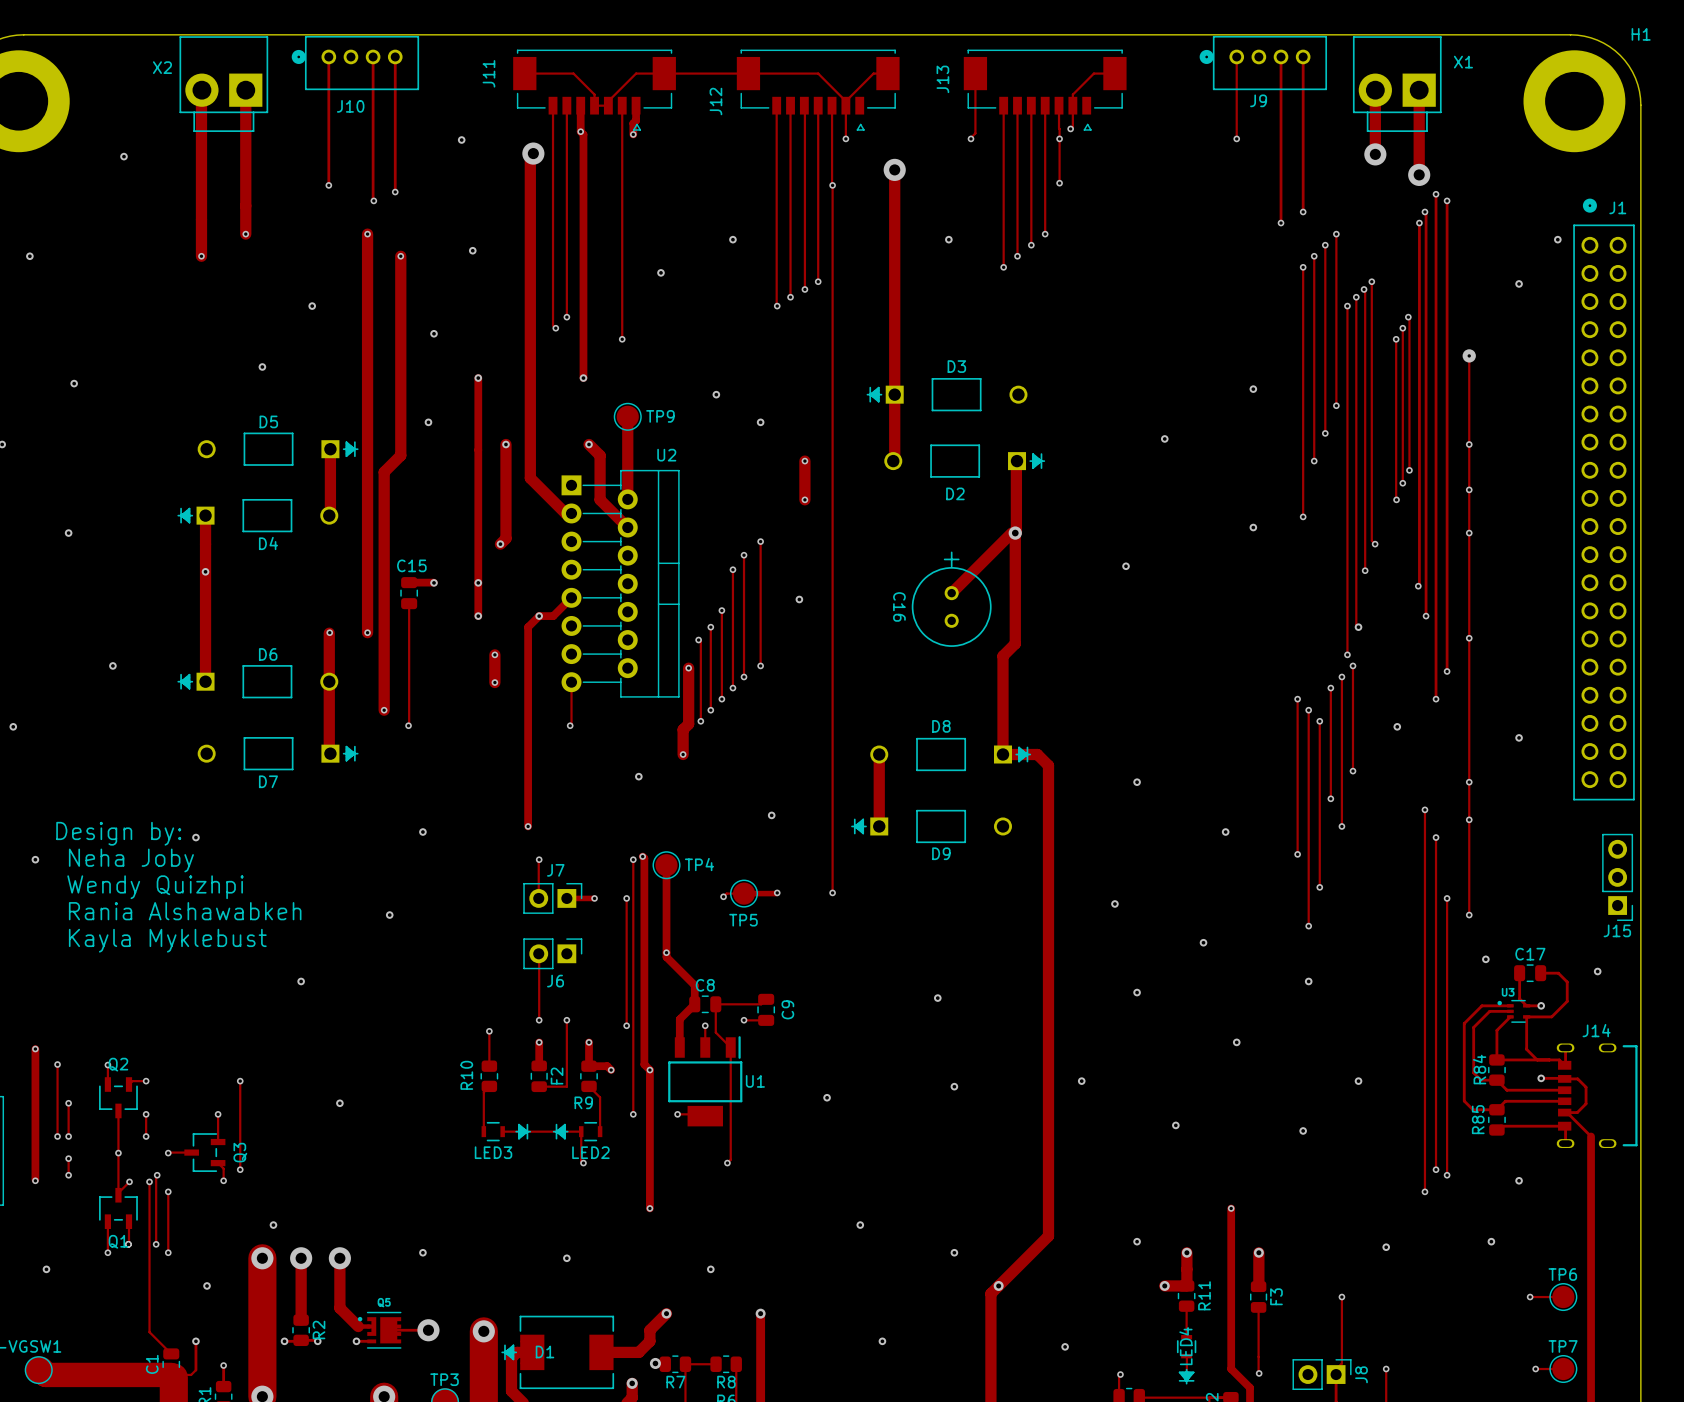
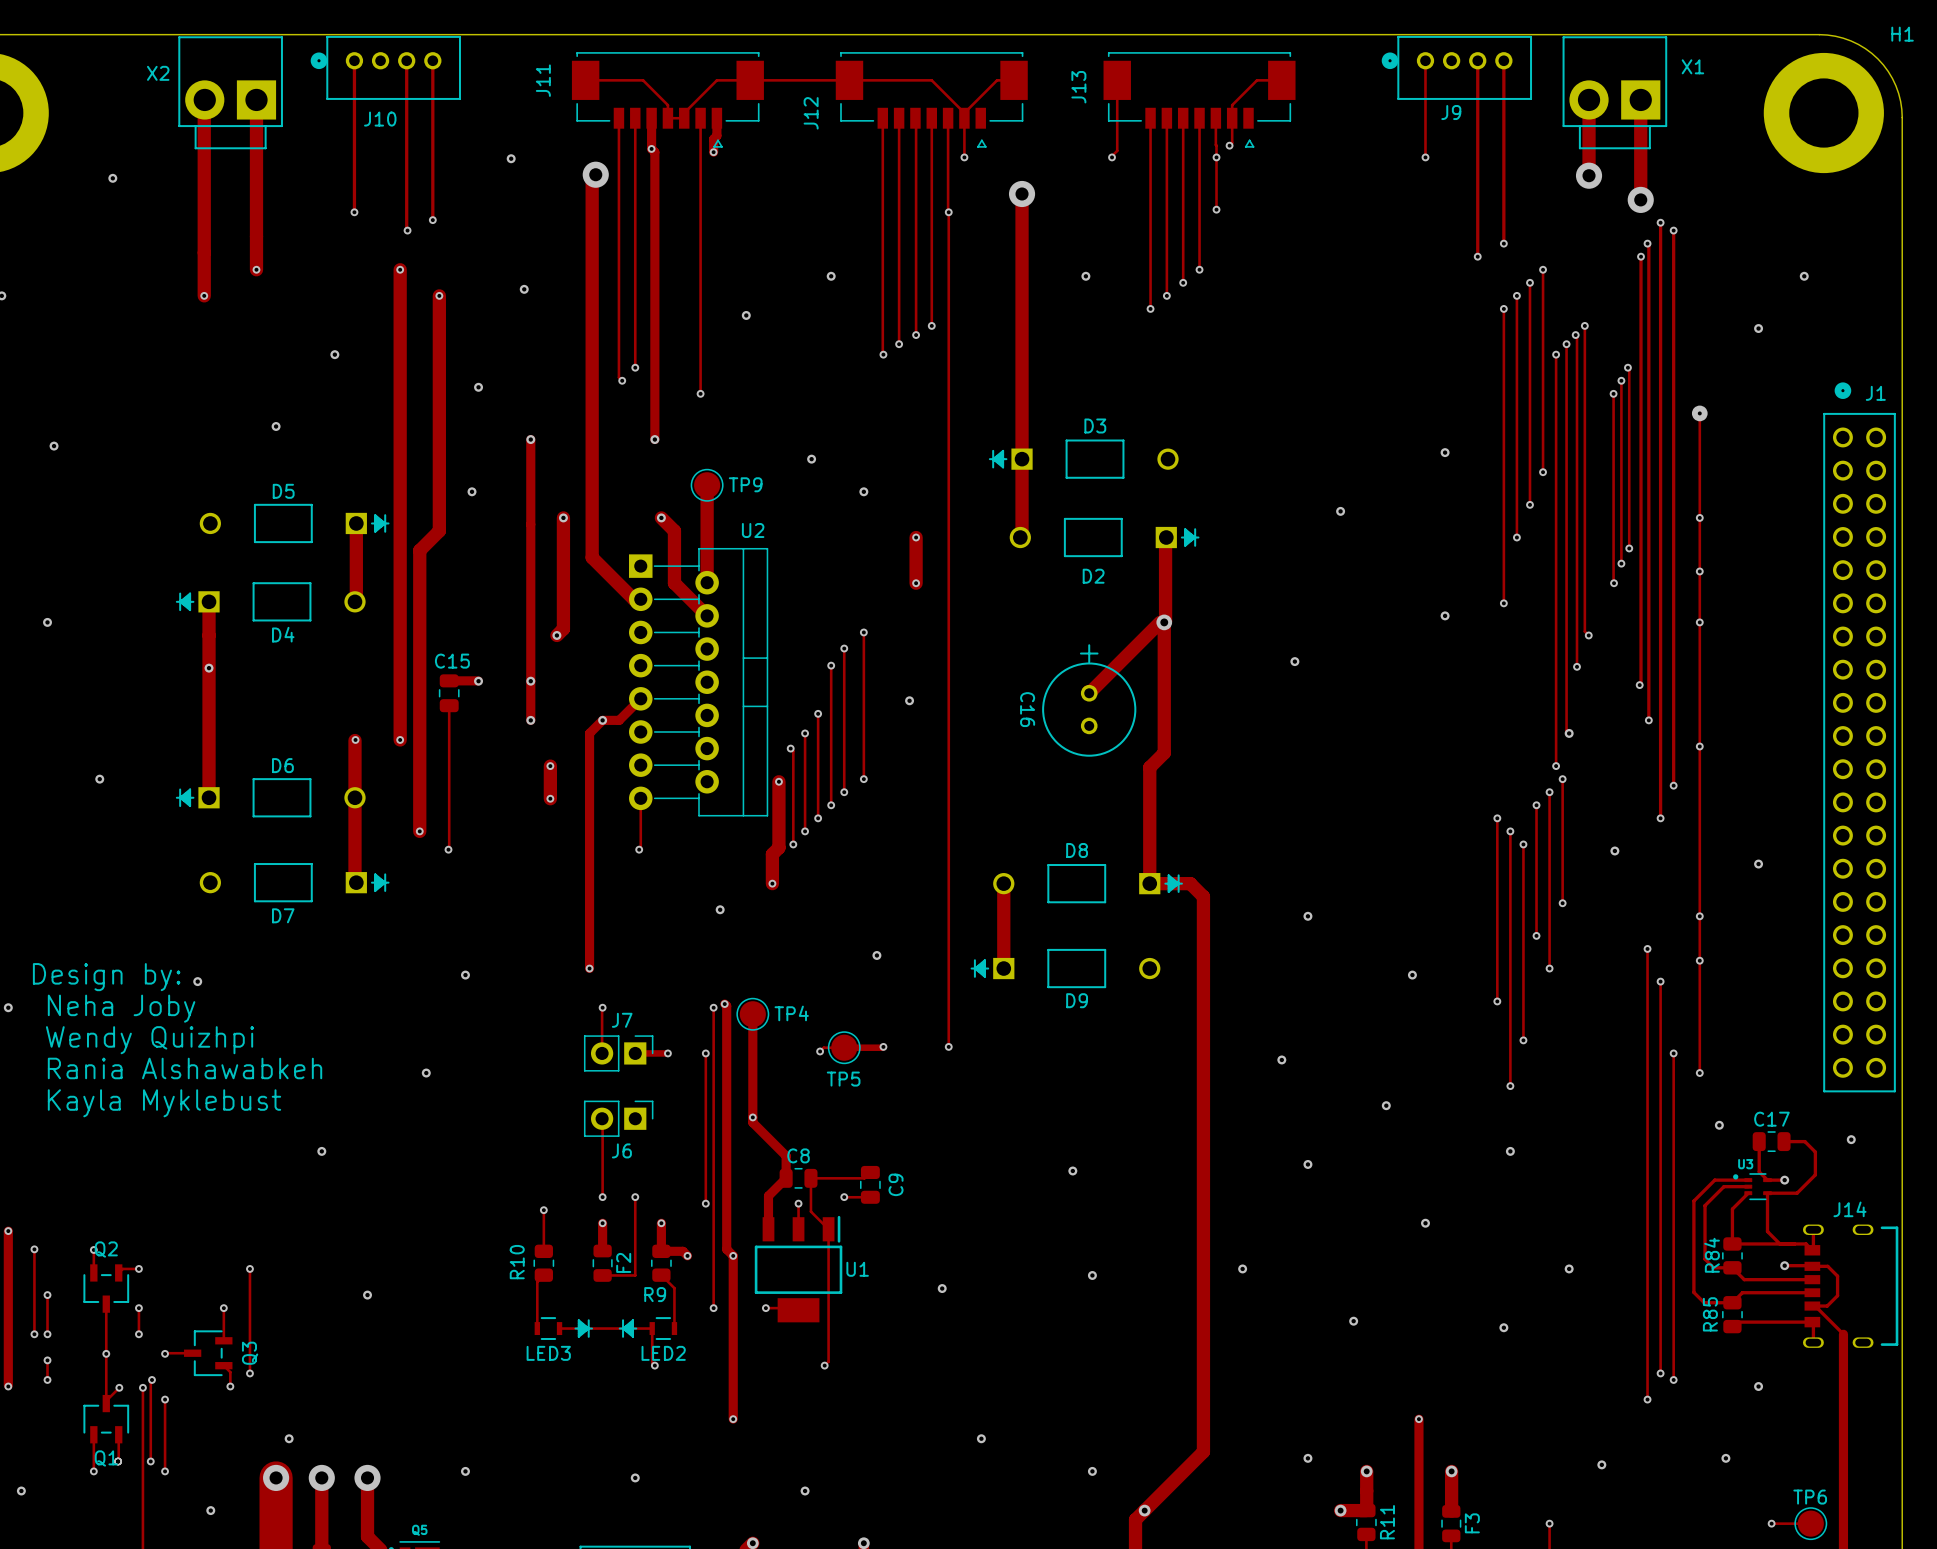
J1 position: (1603, 499) -> (1859, 737)
J15: (1617, 877) -> none

